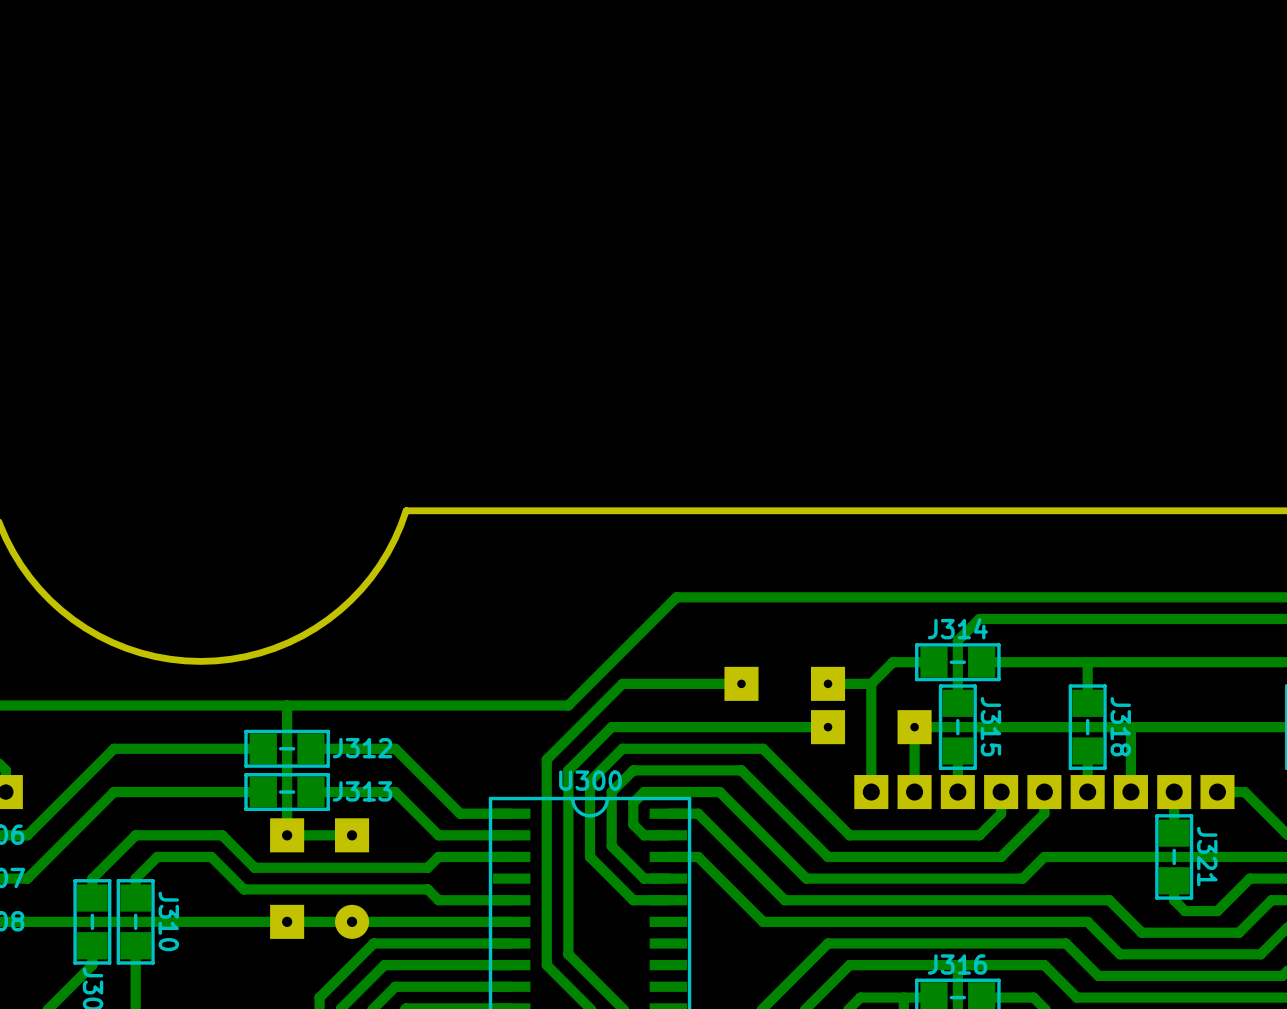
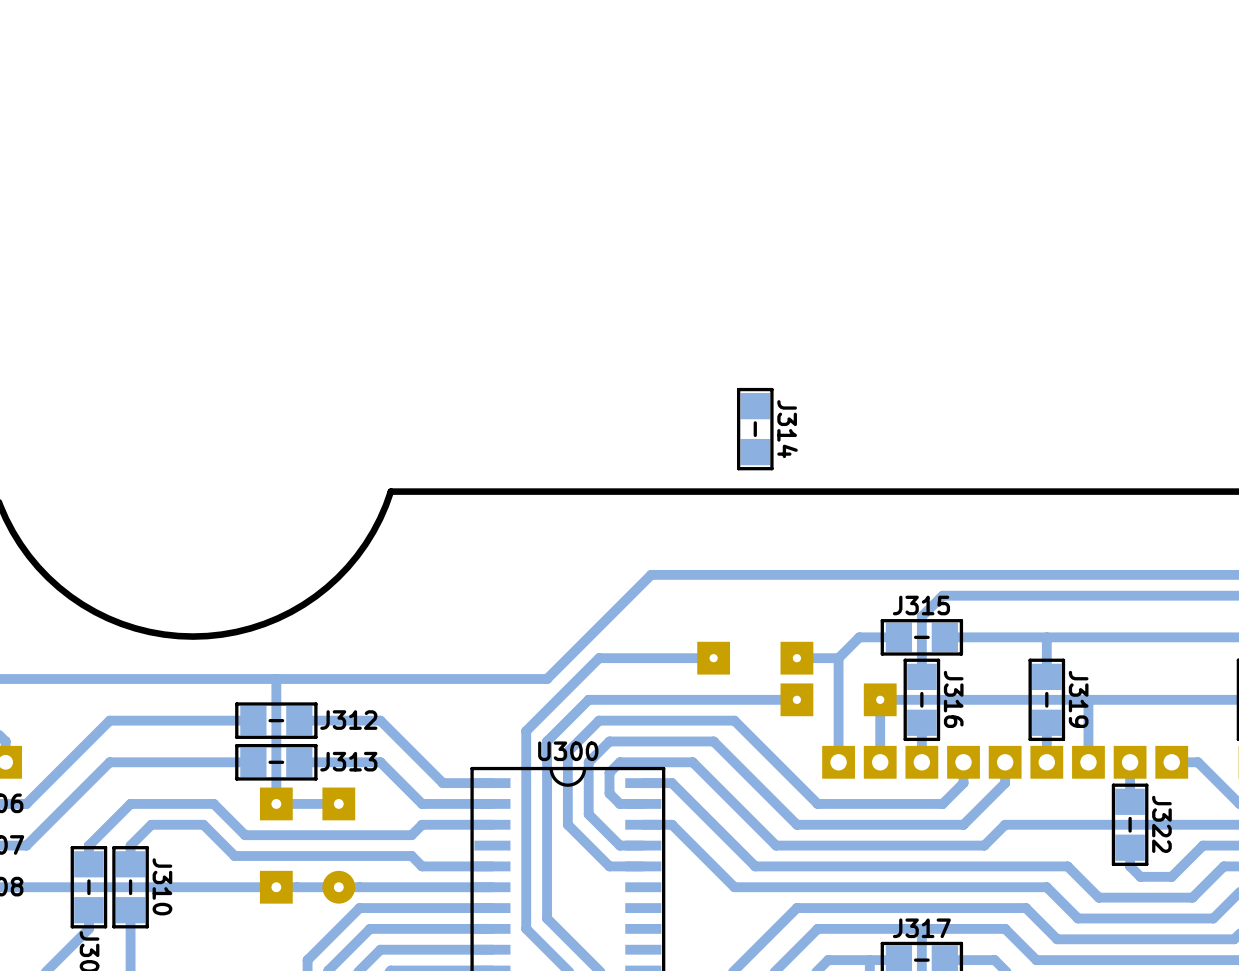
J314: none -> (755, 429)
J314 name: J314 (957, 628) -> J315 (921, 605)
J315 name: J315 (990, 726) -> J316 (953, 699)
J318 name: J318 (1120, 726) -> J319 (1078, 699)
J321 name: J321 (1207, 856) -> J322 (1161, 824)
J316 name: J316 (957, 964) -> J317 (921, 928)

